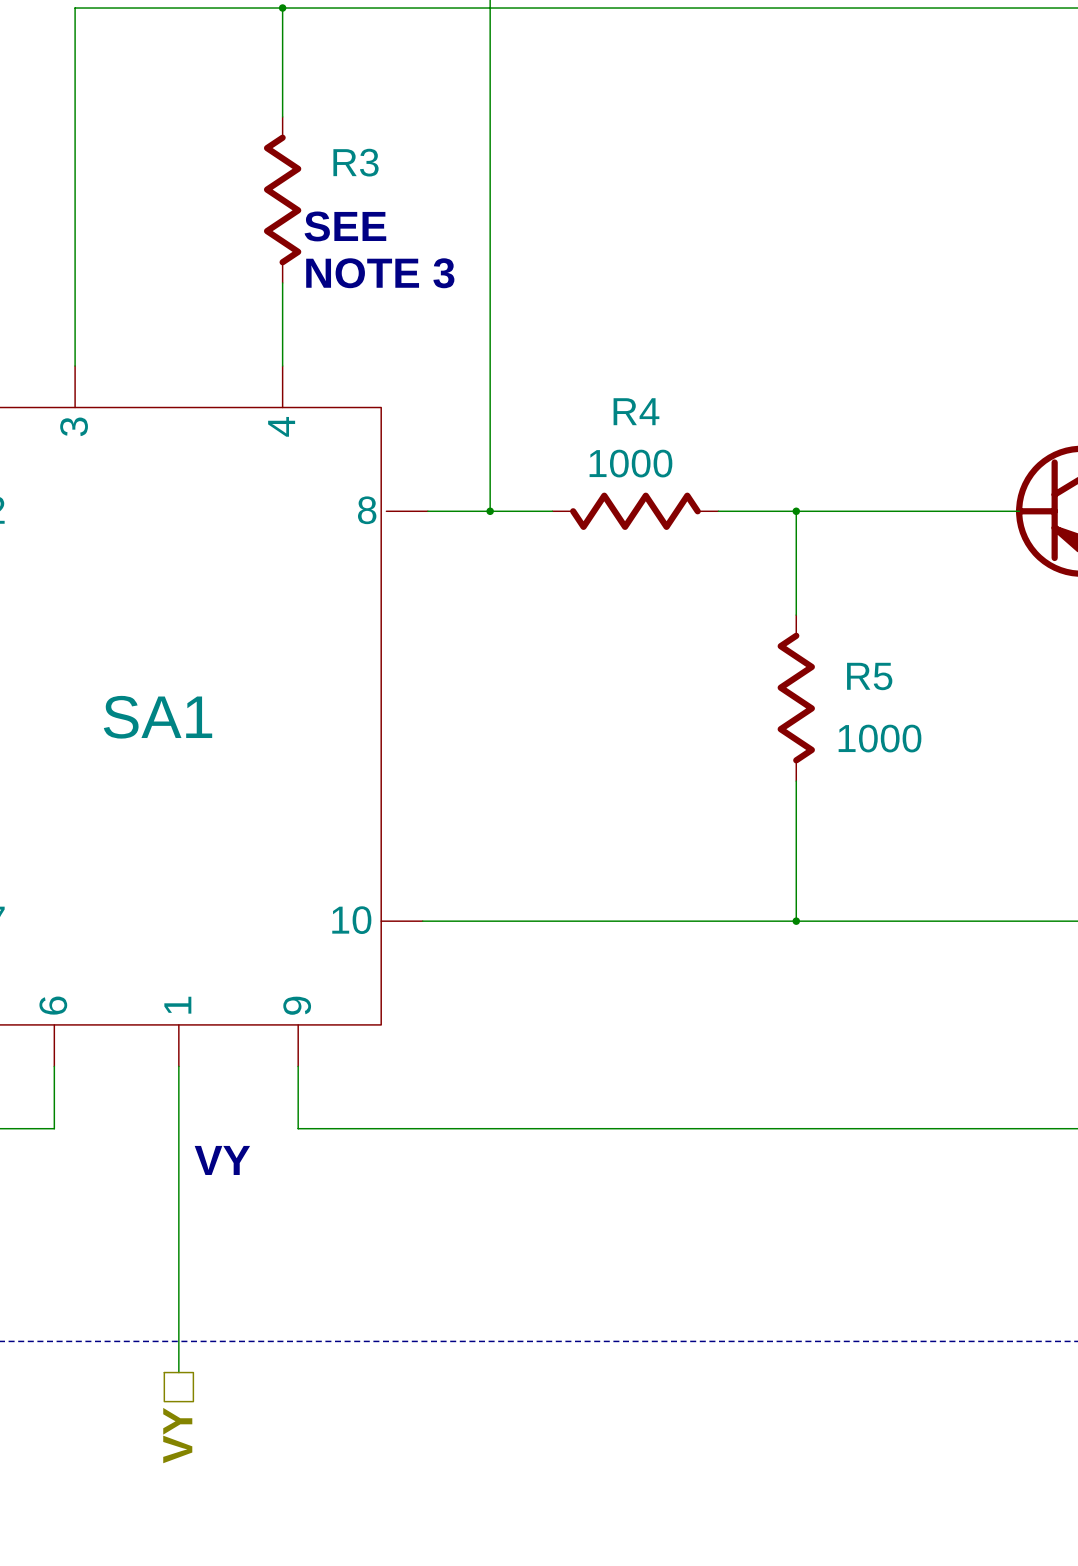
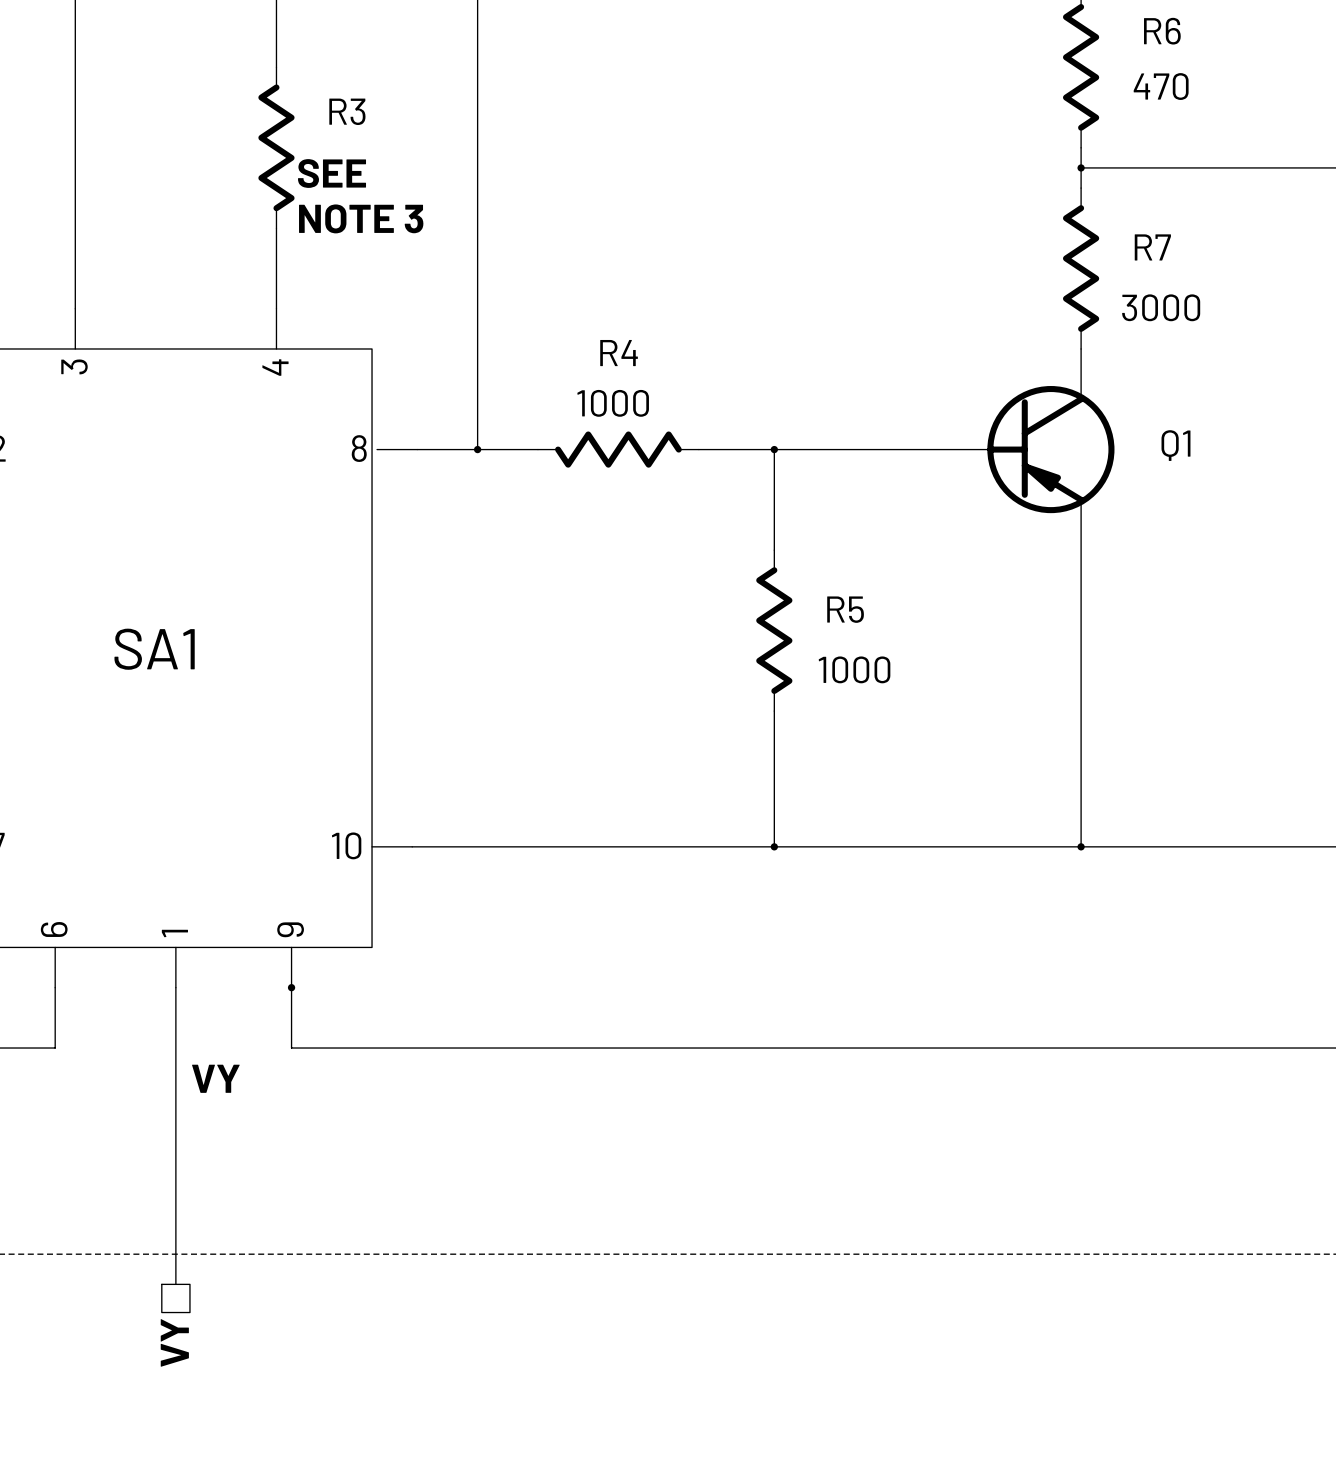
junction: none -> (291, 987)

